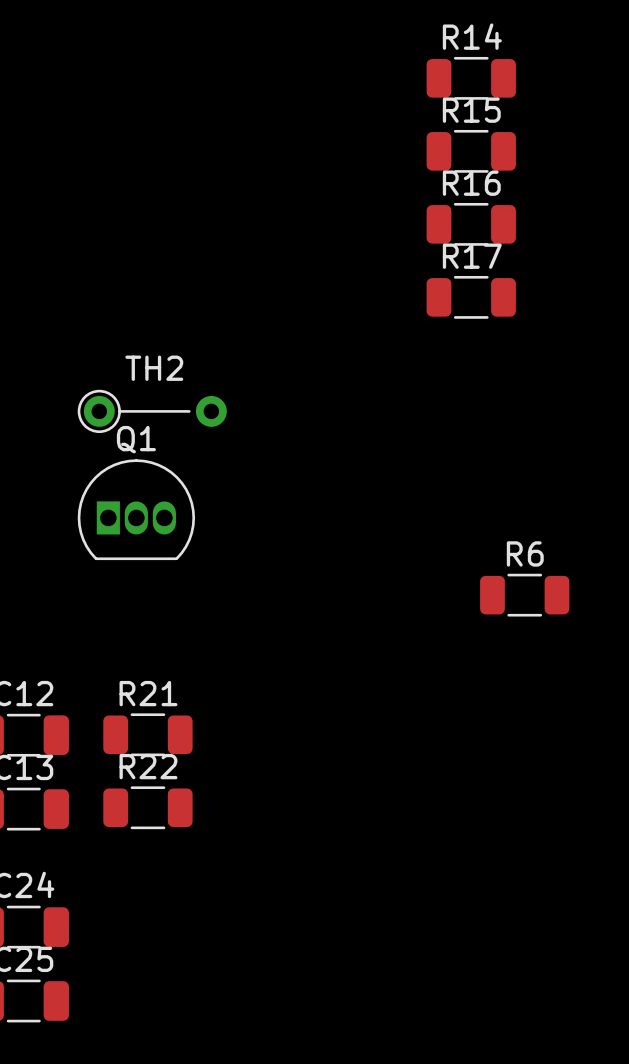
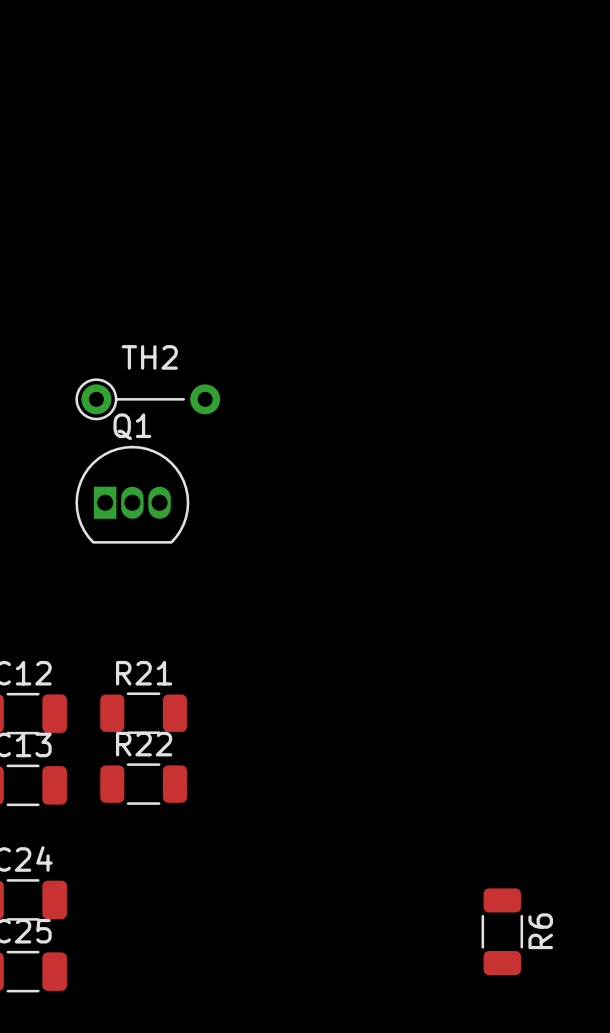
R14: (471, 78) -> none
R15: (471, 151) -> none
R16: (471, 224) -> none
R17: (471, 297) -> none
R6 rotation: 0° (524, 595) -> 90° clockwise (502, 931)
R6 position: (524, 595) -> (502, 931)

